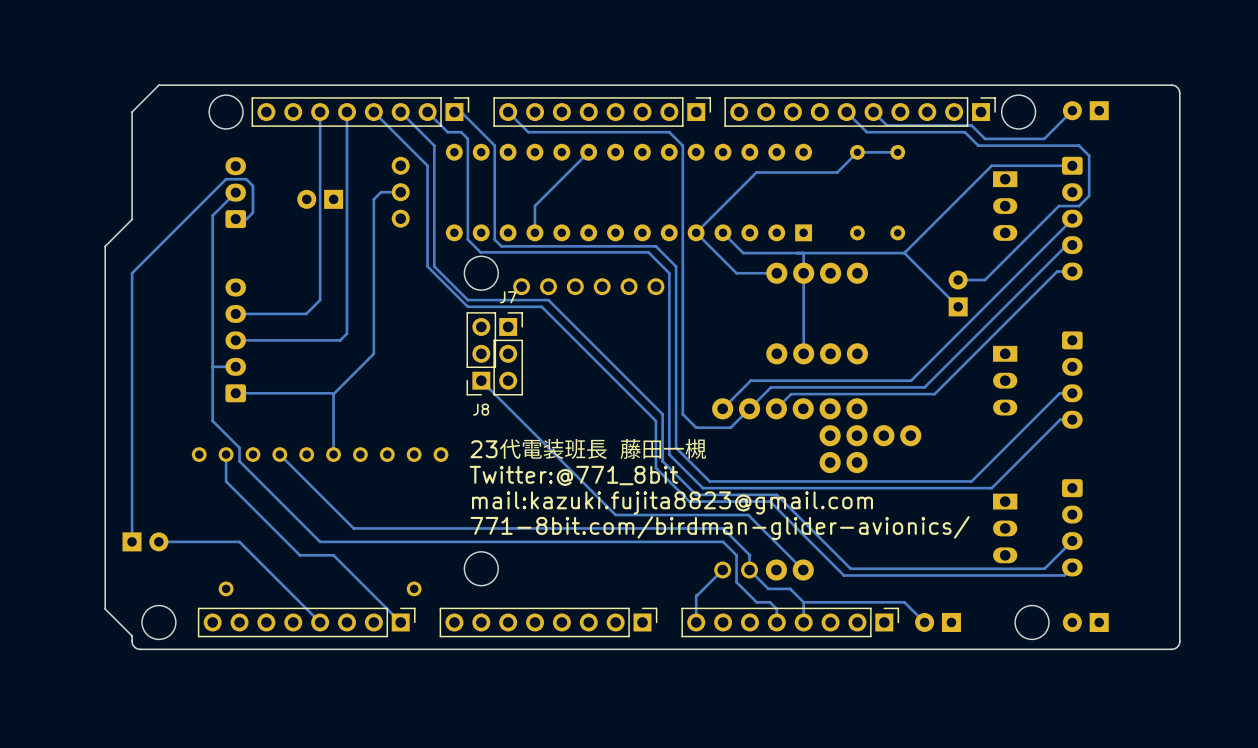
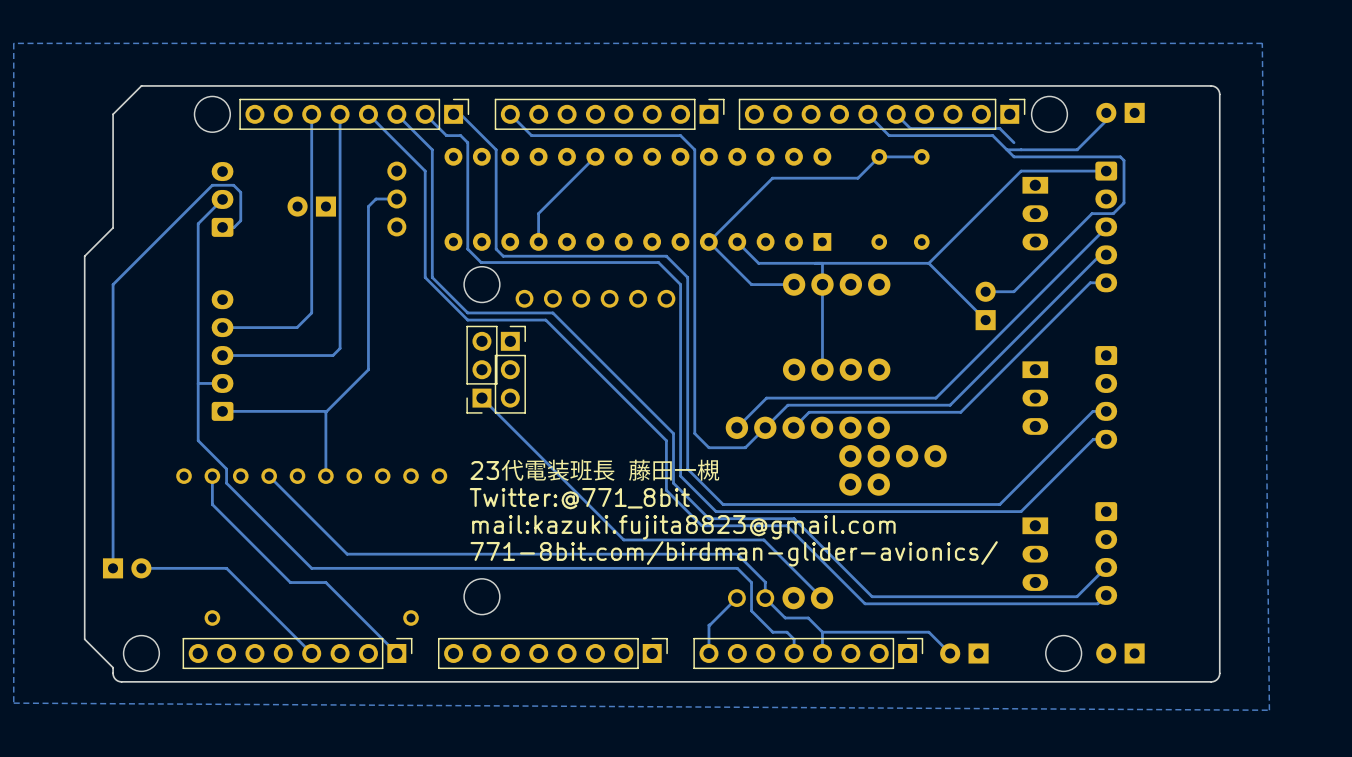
zone outline: none -> (1262, 43) (1269, 710) (13, 703) (13, 43) (1262, 43)
track: (1072, 110) (1044, 138) (985, 138) -> none
track: none -> (1006, 149) (1014, 156) (1120, 156)
track: (1044, 145) (1079, 145) (1085, 152) -> (1077, 149) (1106, 120) (1106, 112)
J7 name: J7 (508, 297) -> none
J8 name: J8 (481, 409) -> none

